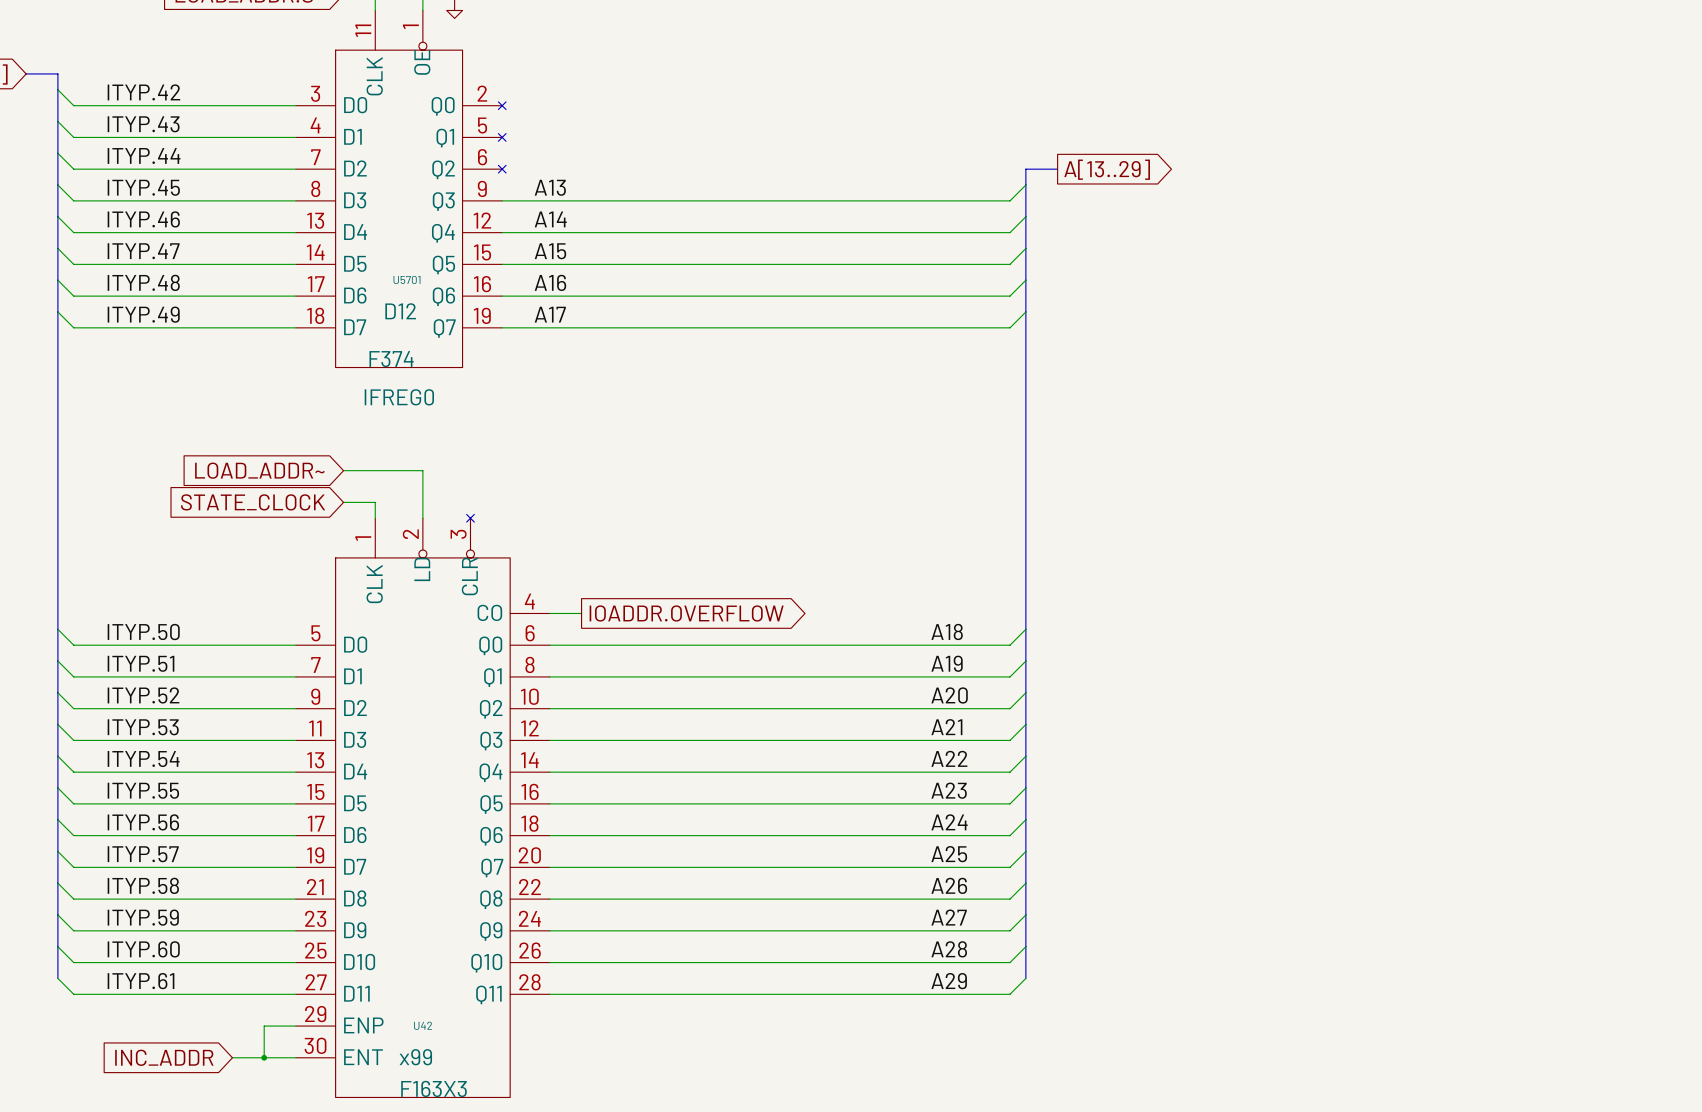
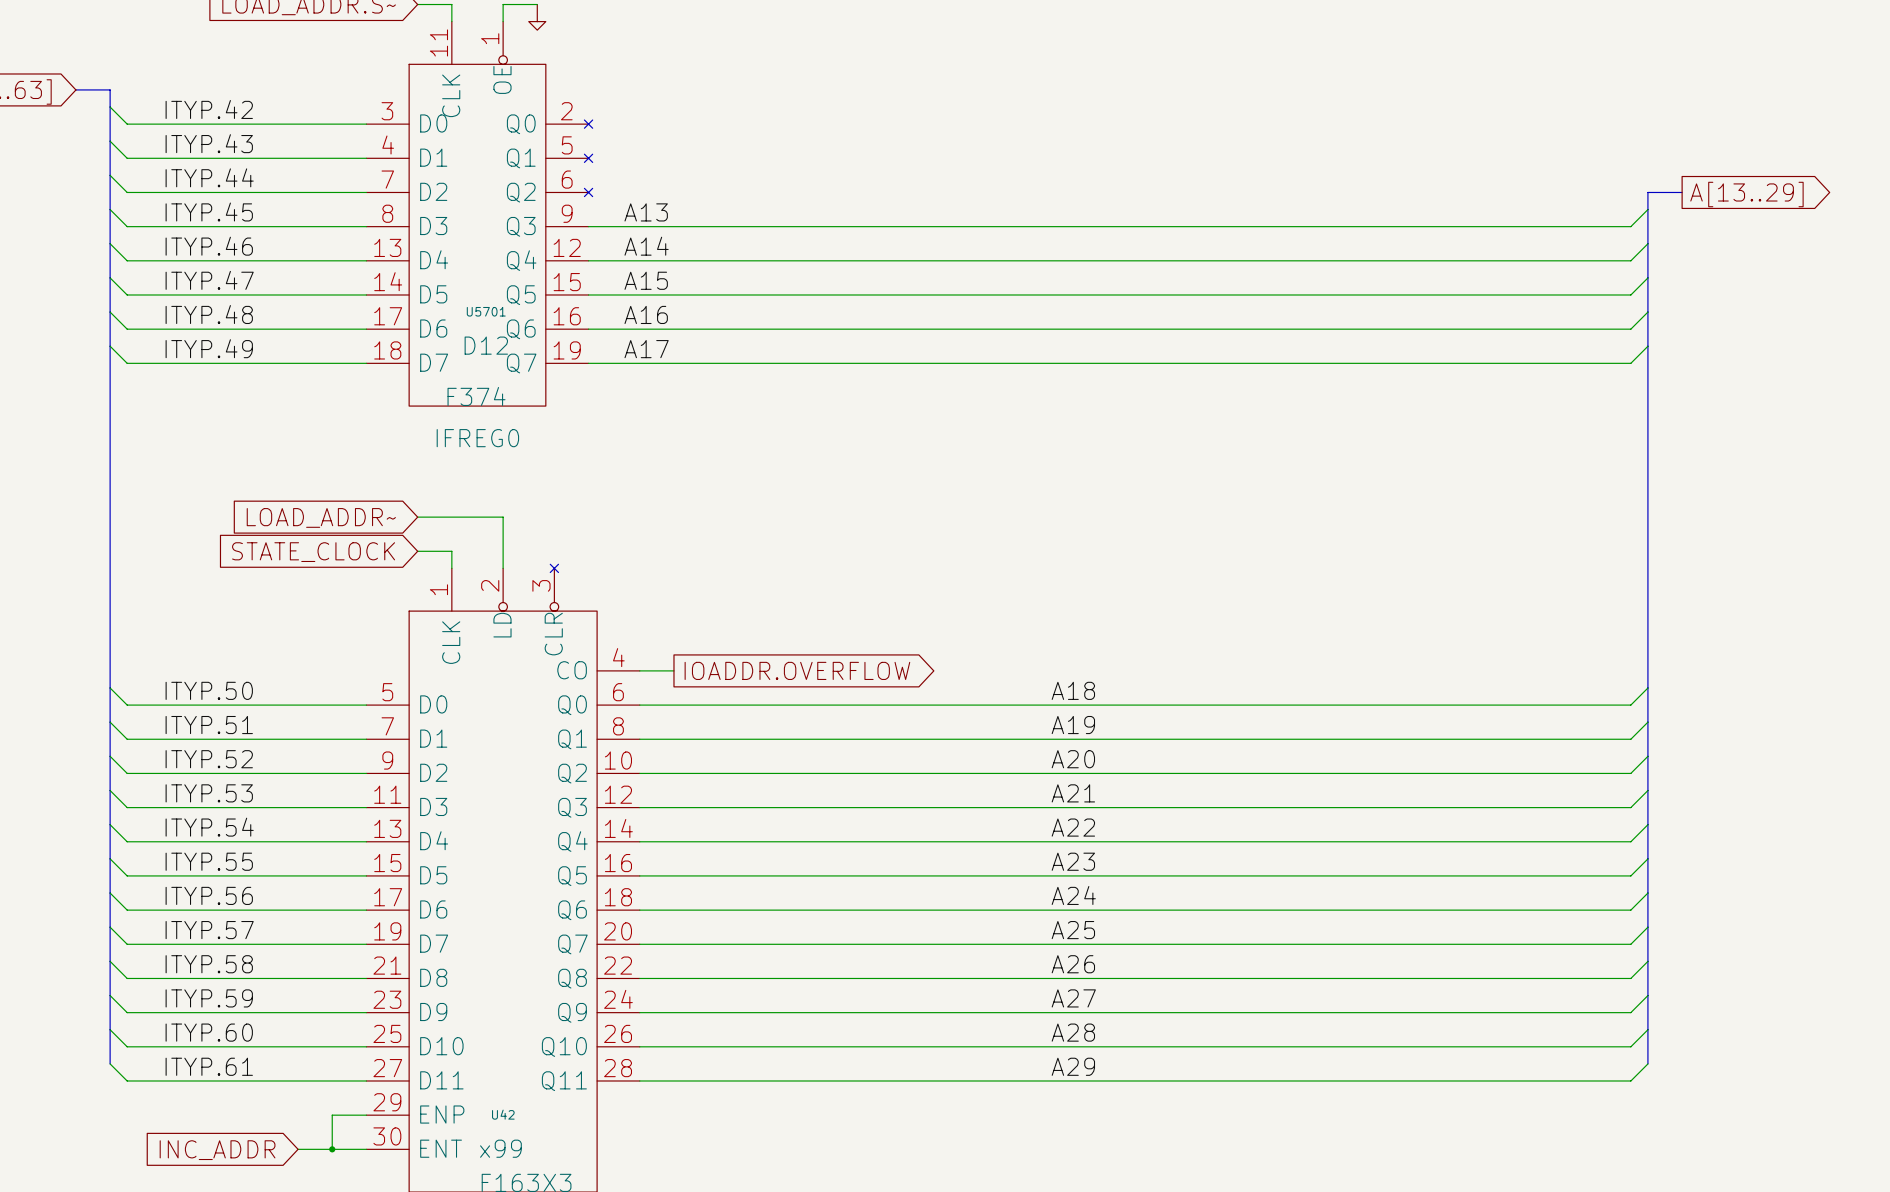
bus: (1057, 169) (1025, 169) (1025, 978) -> none
global label: A[13..29] (1107, 169) -> none
bus: none -> (1682, 192) (1647, 192) (1647, 1063)
global label: none -> A[13..29] (1746, 194)
wire: (1025, 185) (1010, 200) -> (1647, 209) (1630, 226) (1135, 226)
wire: (1025, 216) (1010, 232) -> (1647, 243) (1630, 260) (1135, 260)
wire: (1025, 248) (1010, 264) -> (1647, 277) (1630, 294) (1135, 294)
wire: (1025, 280) (1010, 296) -> (1647, 312) (1630, 329) (1135, 329)
wire: (1025, 311) (1010, 327) -> (1647, 346) (1630, 363) (1135, 363)
wire: (1025, 629) (1010, 645) -> (1647, 687) (1630, 705) (1135, 705)
wire: (1025, 661) (1010, 676) -> (1647, 722) (1630, 739) (1135, 739)
wire: (1025, 692) (1010, 708) -> (1647, 756) (1630, 773) (1135, 773)
wire: (1025, 724) (1010, 740) -> (1647, 790) (1630, 807) (1135, 807)
wire: (1025, 756) (1010, 772) -> (1647, 824) (1630, 841) (1135, 841)
wire: (1025, 788) (1010, 803) -> (1647, 858) (1630, 875) (1135, 875)
wire: (1025, 819) (1010, 835) -> (1647, 893) (1630, 910) (1135, 910)
wire: (1025, 851) (1010, 867) -> (1647, 927) (1630, 944) (1135, 944)
wire: (1025, 883) (1010, 899) -> (1647, 961) (1630, 978) (1135, 978)
wire: (1025, 914) (1010, 930) -> (1647, 995) (1630, 1012) (1135, 1012)
wire: (1025, 946) (1010, 962) -> (1647, 1029) (1630, 1046) (1135, 1046)
wire: (1025, 978) (1010, 994) -> (1647, 1063) (1630, 1080) (1135, 1080)

